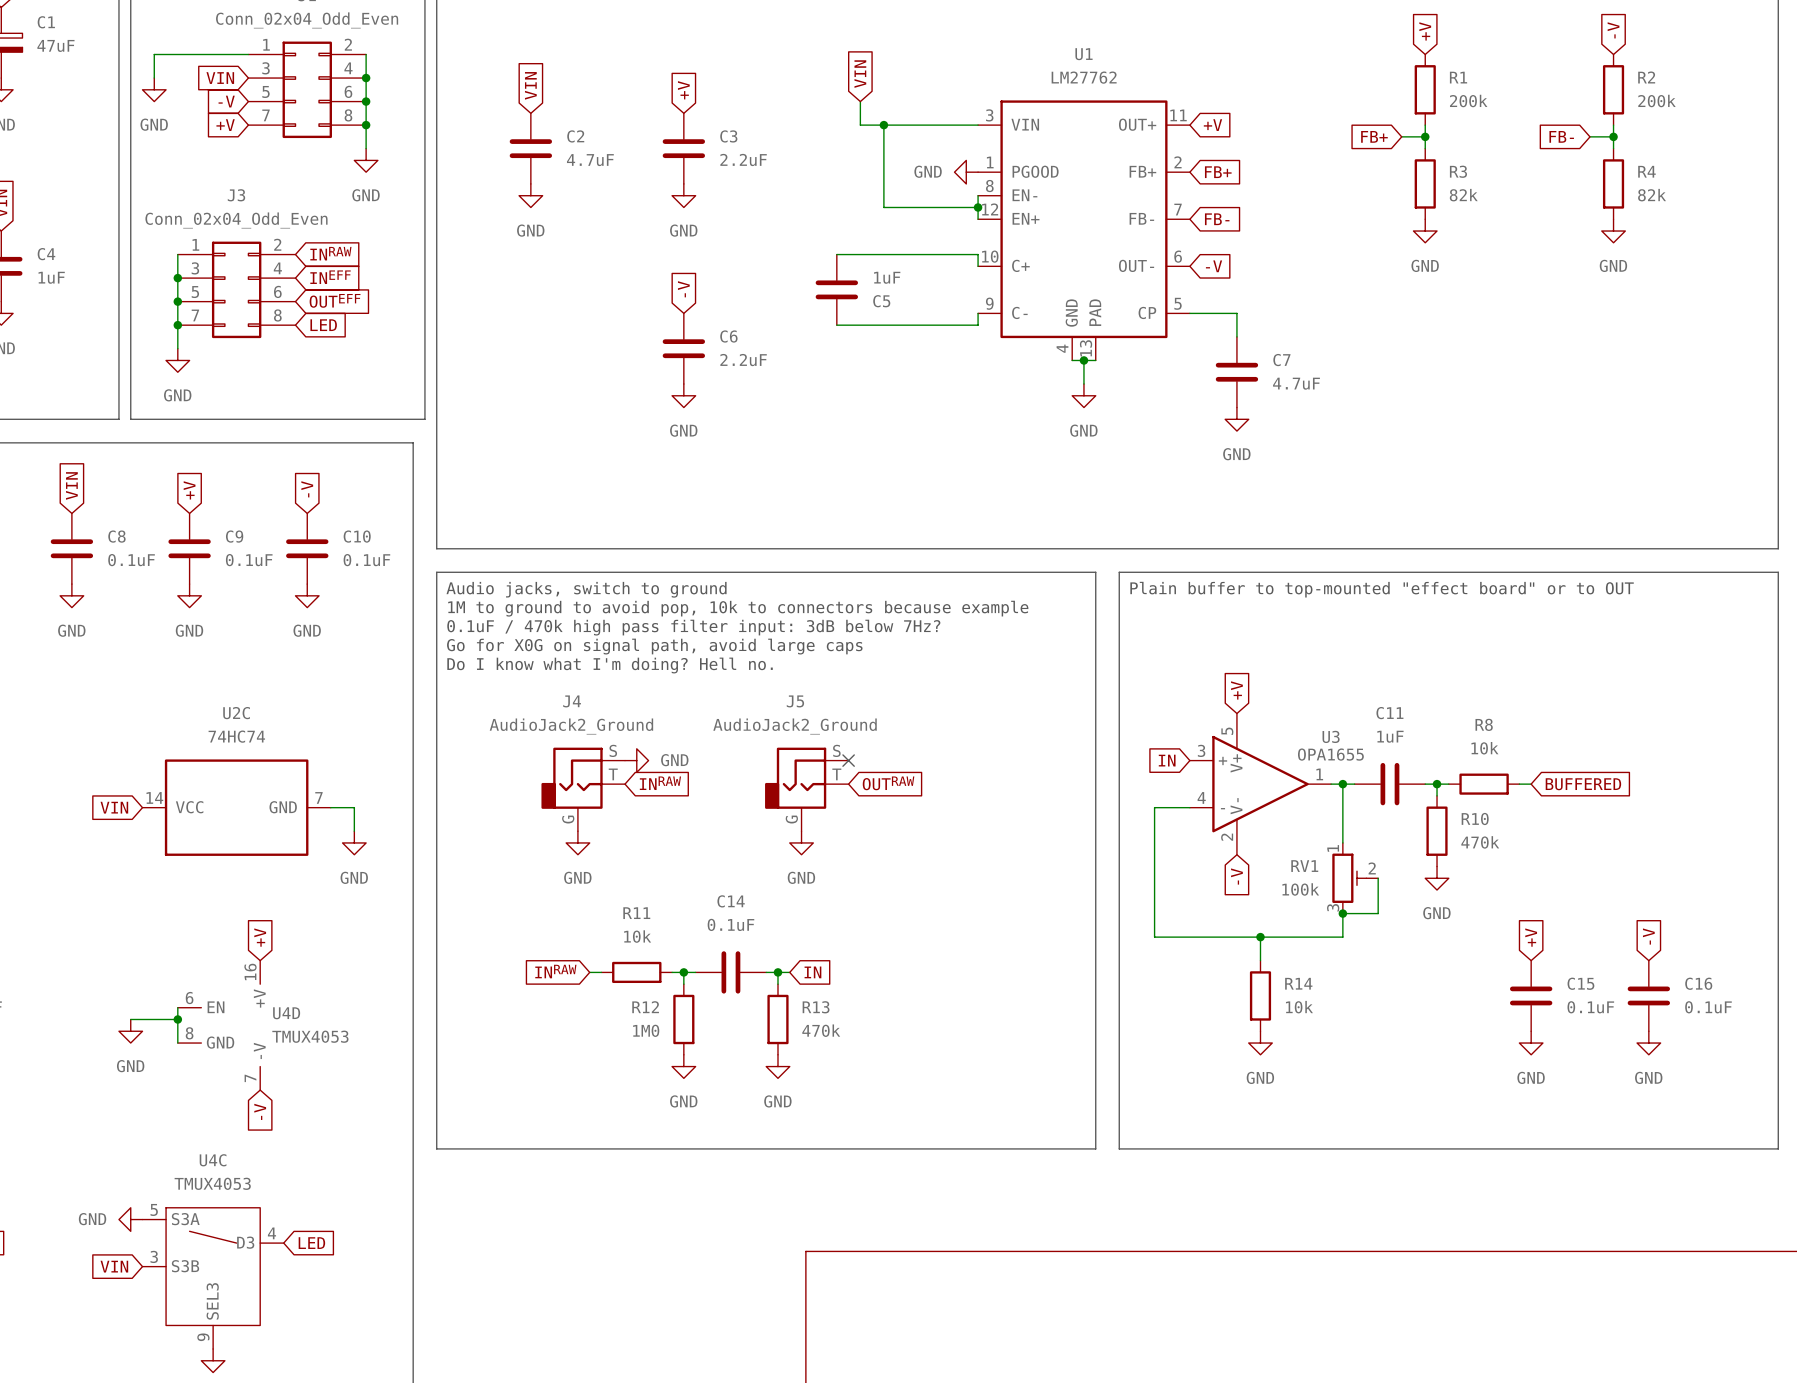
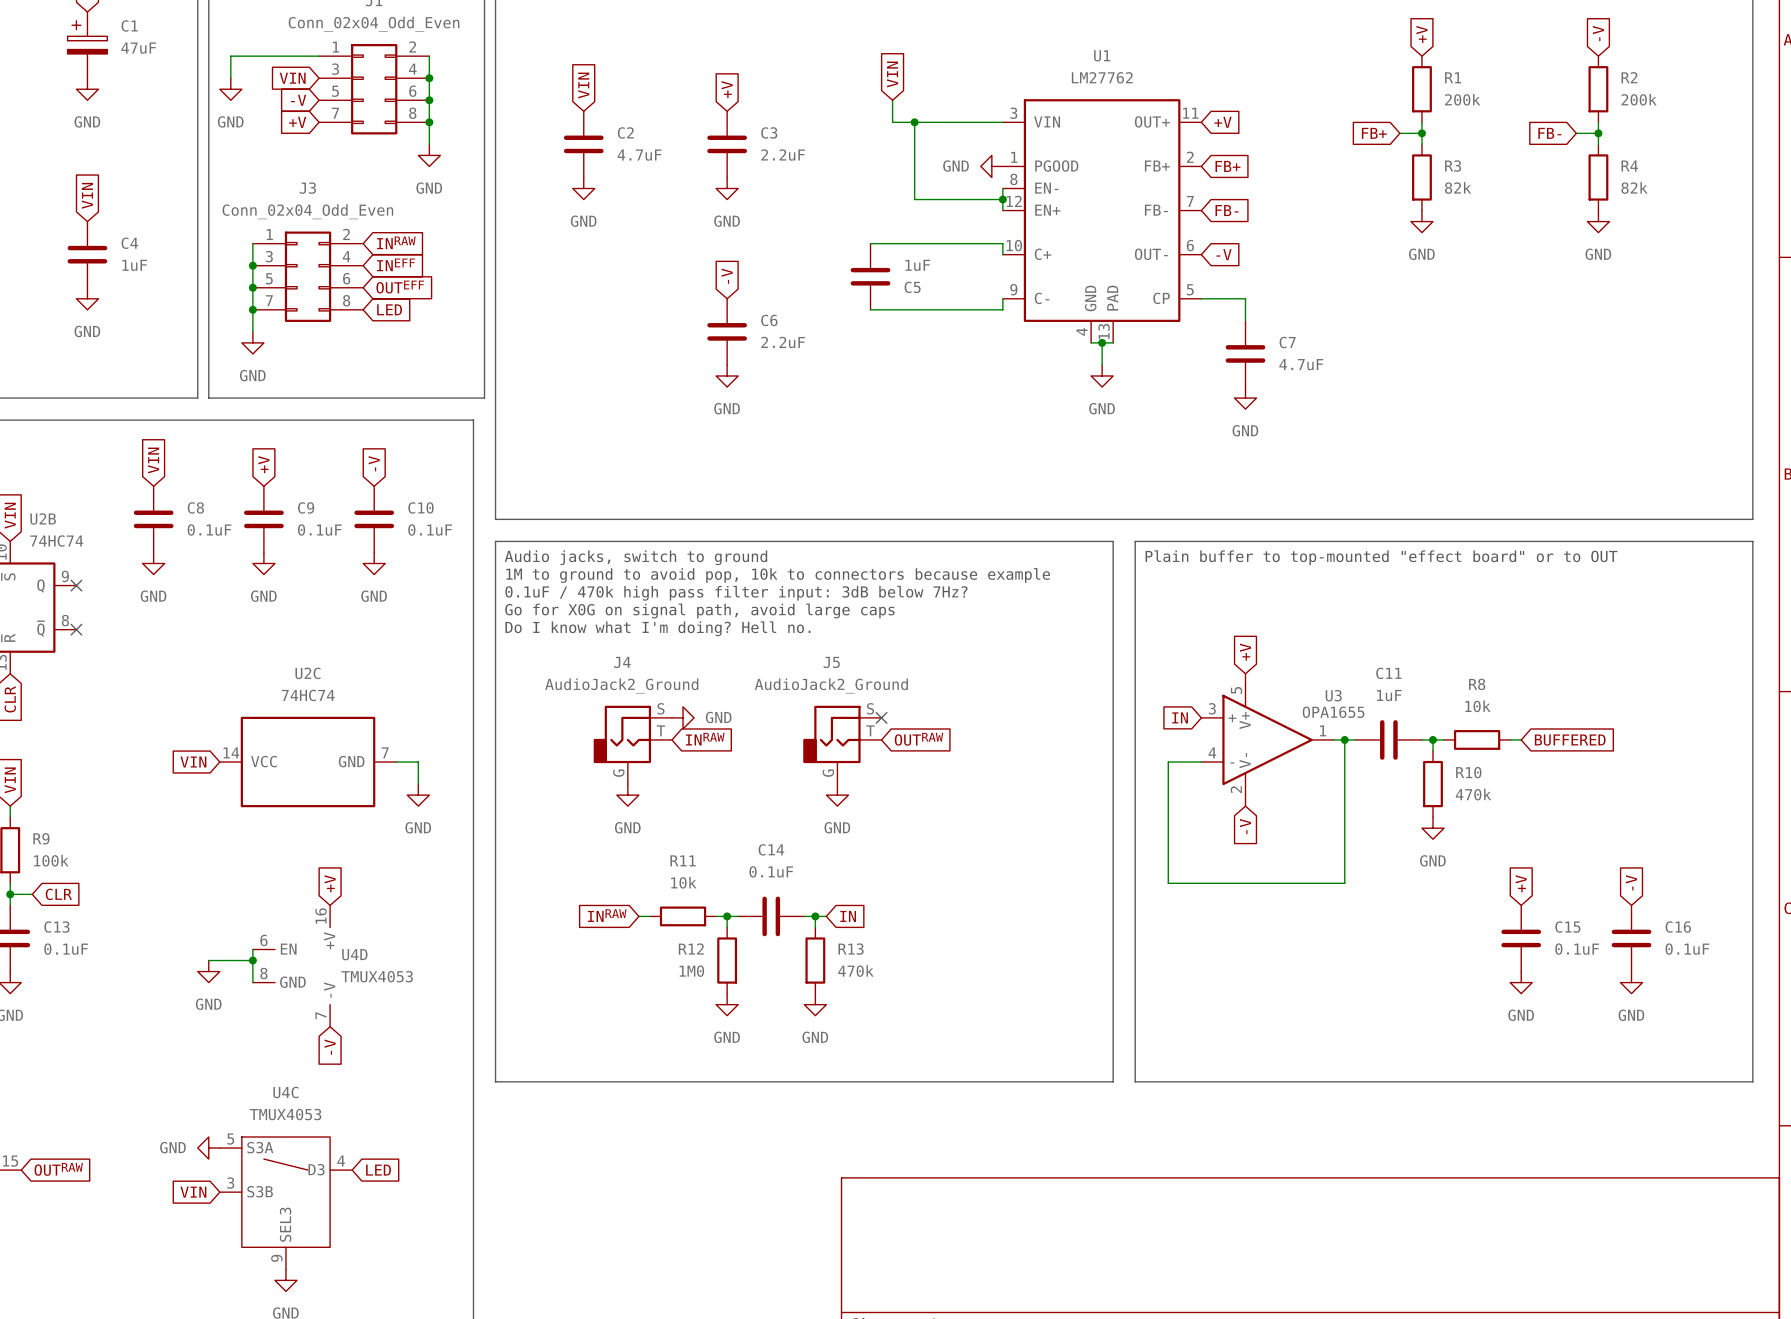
RV1: 100k (1355, 878) -> none
wire: (1378, 878) (1378, 913) (1342, 913) -> (1344, 795) (1344, 861)
junction: (1342, 913) -> none
wire: (1260, 937) (1260, 960) -> none
junction: (1260, 937) -> none
R14: 10k (1260, 995) -> none
power symbol: GND (1260, 1043) -> none

